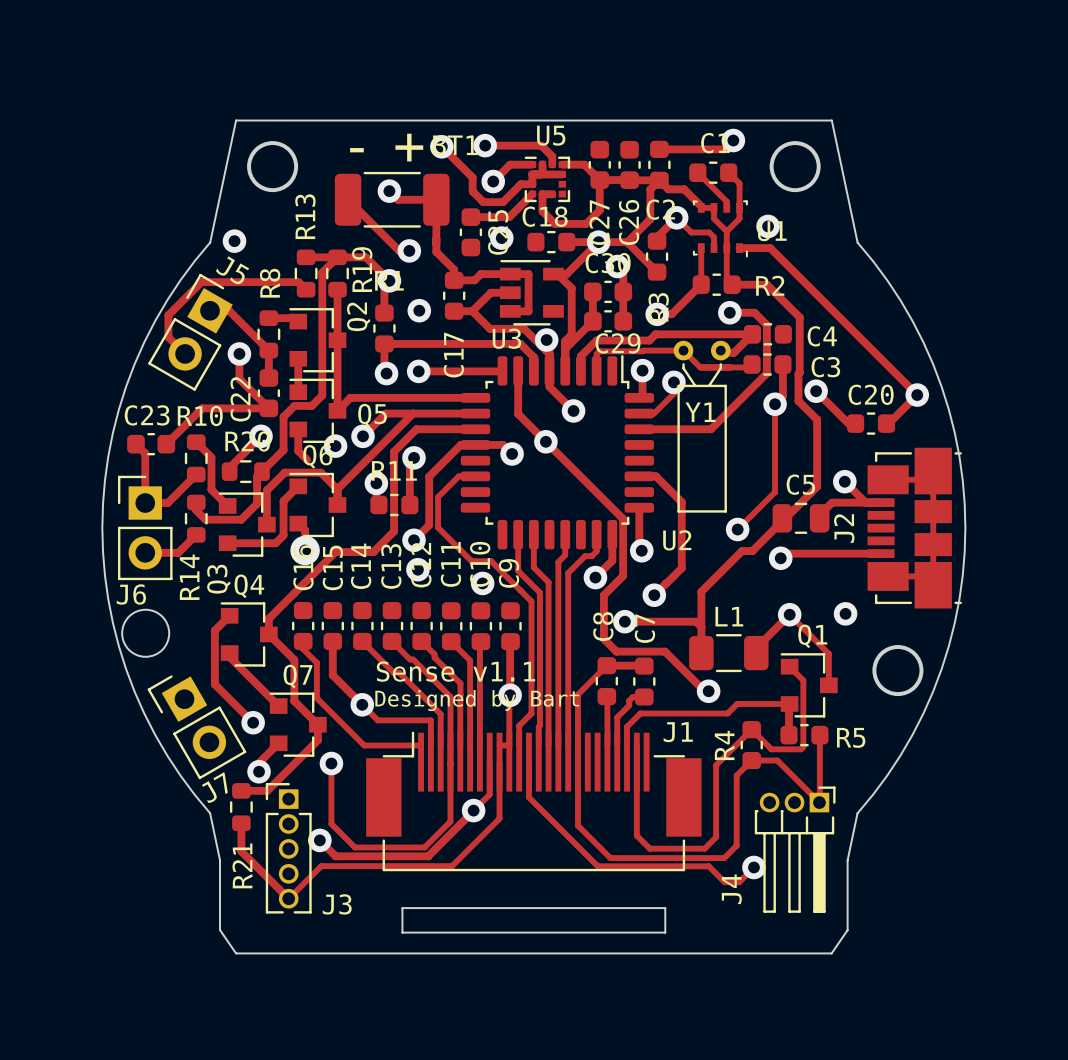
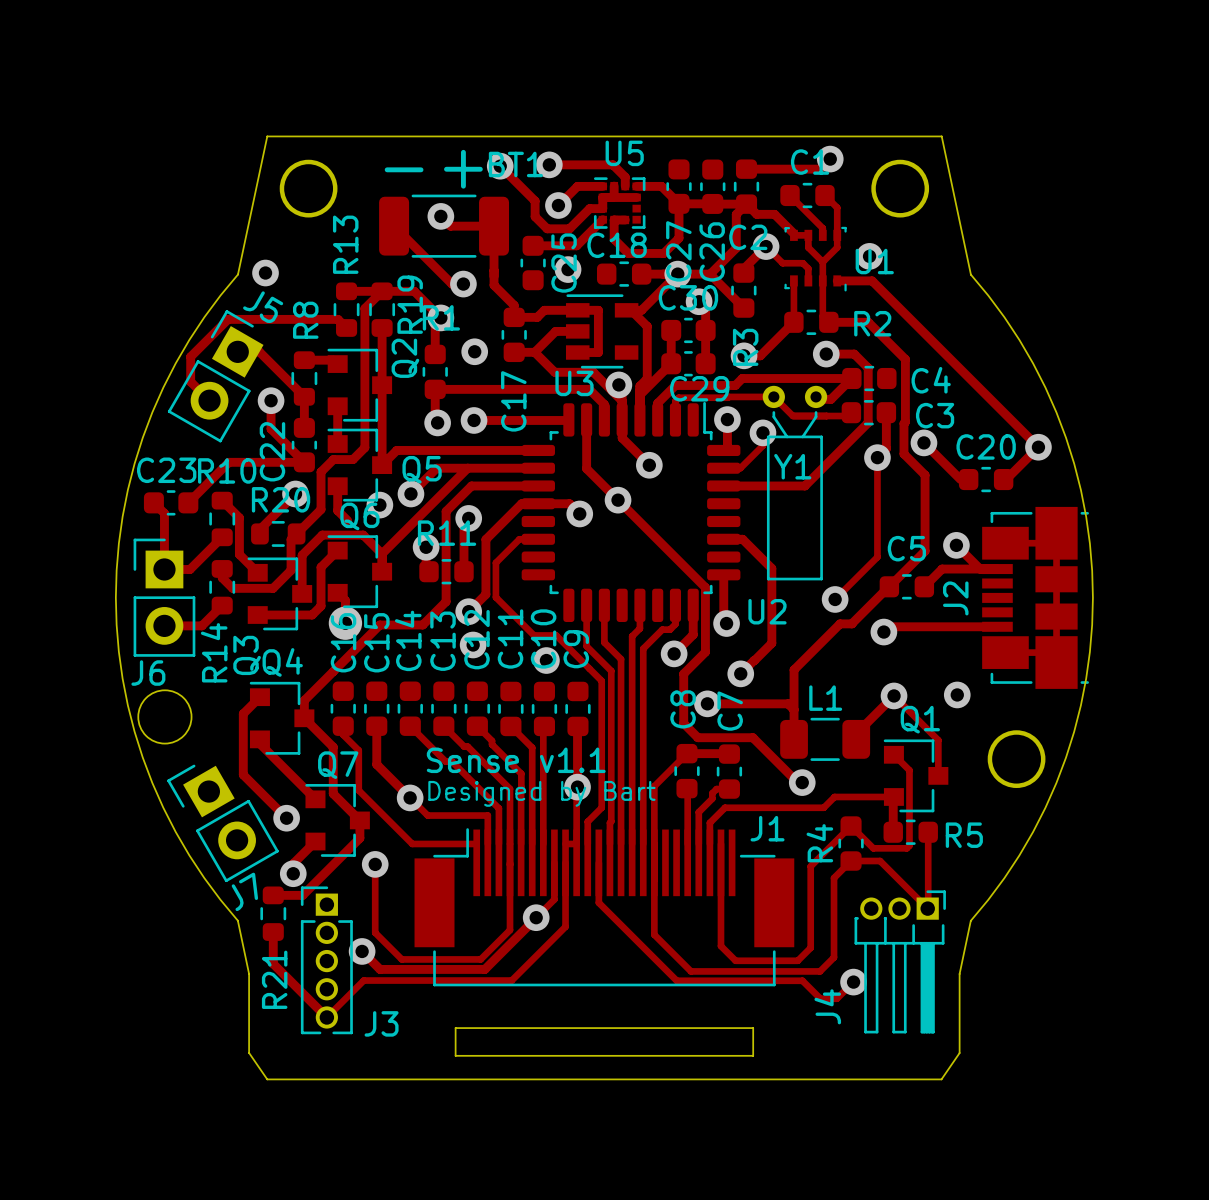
C5 footprint: [772, 502, 830, 534] -> [879, 574, 935, 600]

